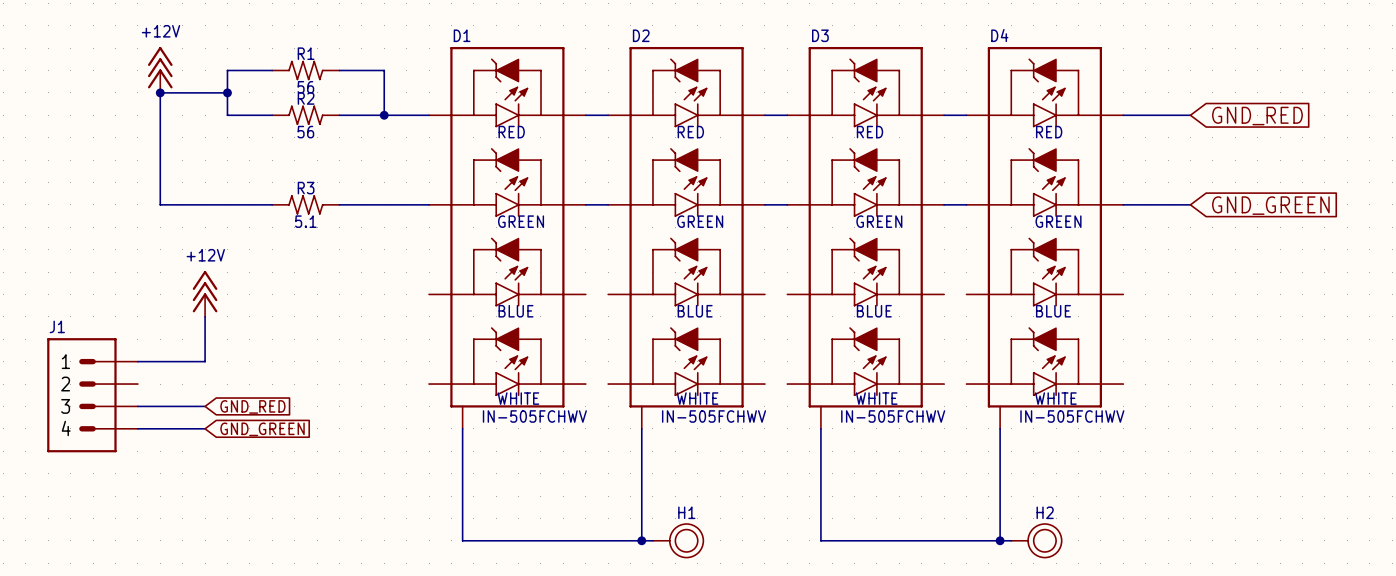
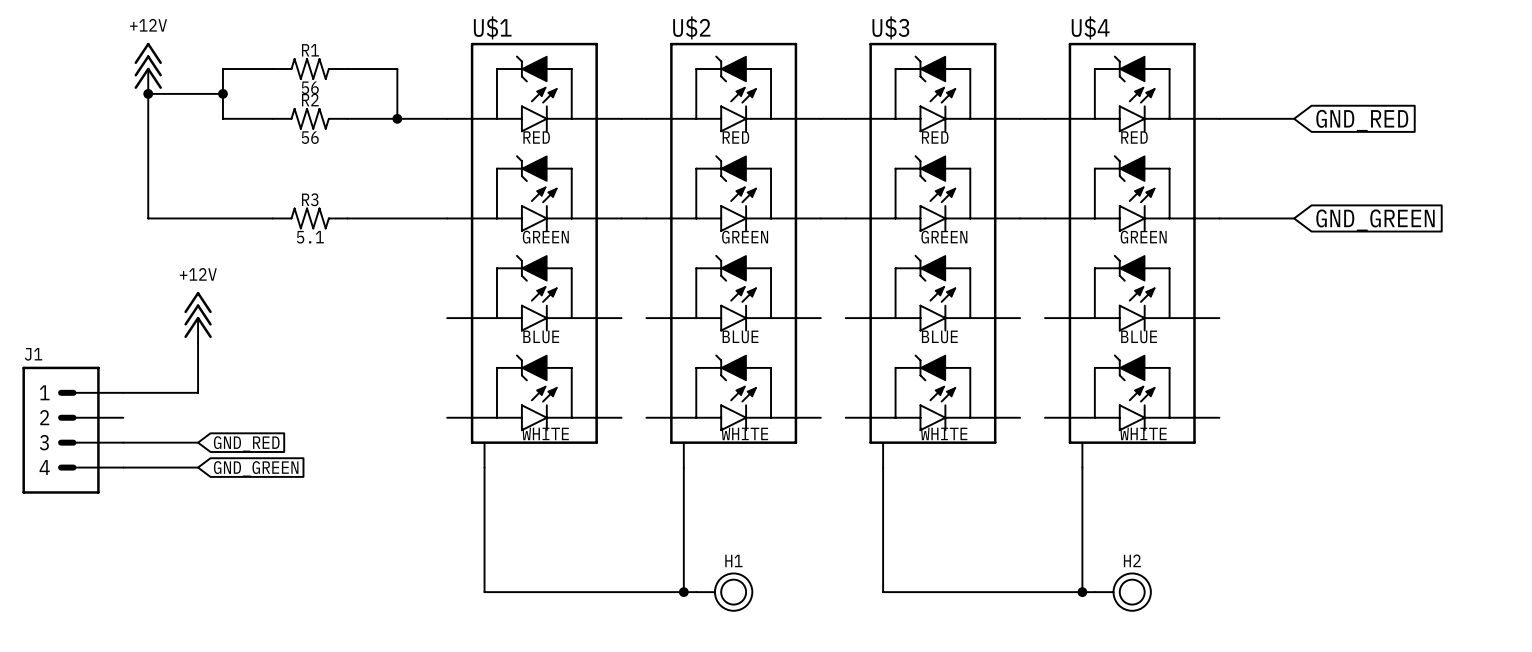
D1 name: D1 (462, 35) -> U$1 (492, 27)
D2 name: D2 (641, 35) -> U$2 (691, 27)
D3 name: D3 (820, 35) -> U$3 (890, 27)
D4 name: D4 (999, 35) -> U$4 (1090, 27)
D1 text: IN-505FCHWV (534, 416) -> none
D2 text: IN-505FCHWV (714, 416) -> none
D3 text: IN-505FCHWV (893, 416) -> none
D4 text: IN-505FCHWV (1072, 416) -> none

